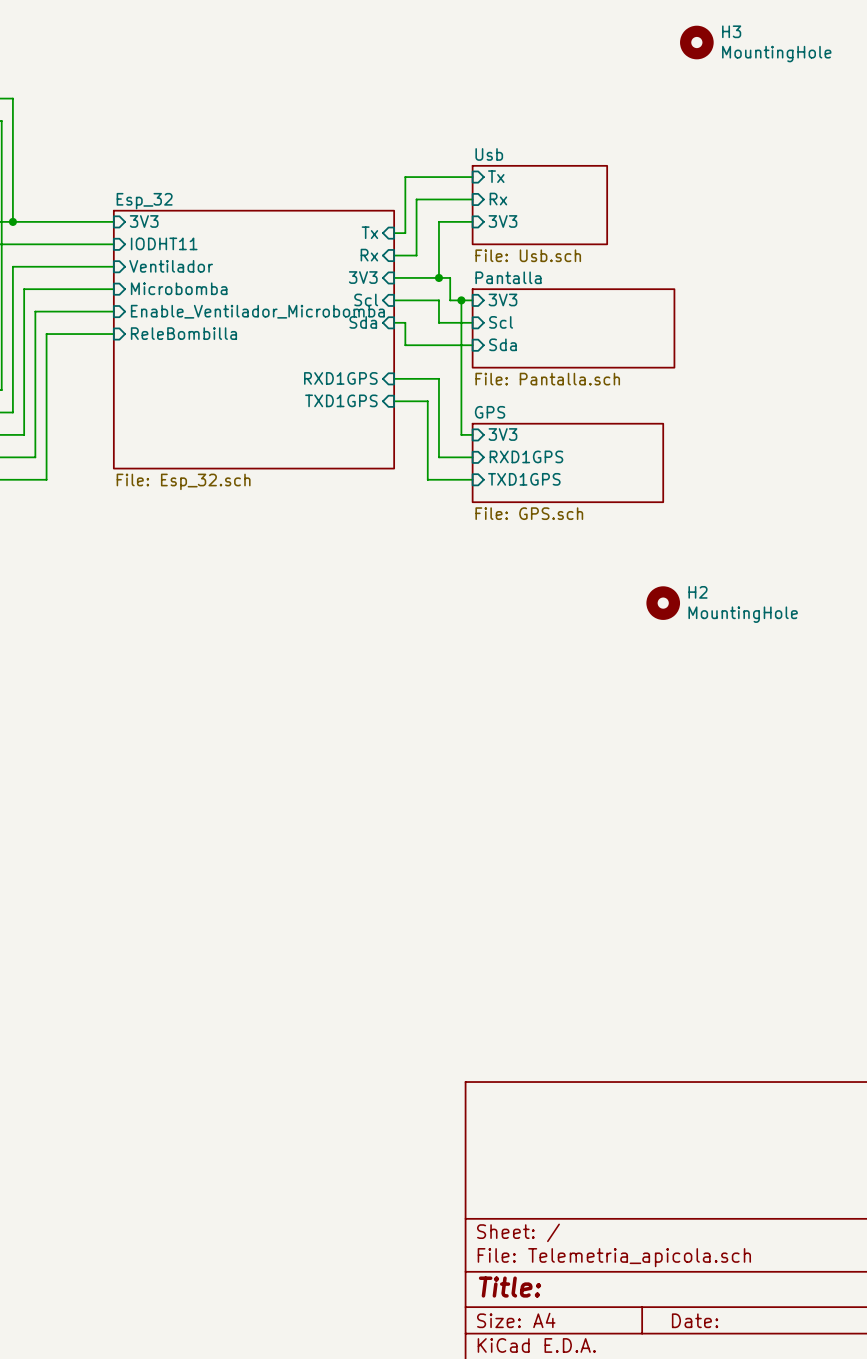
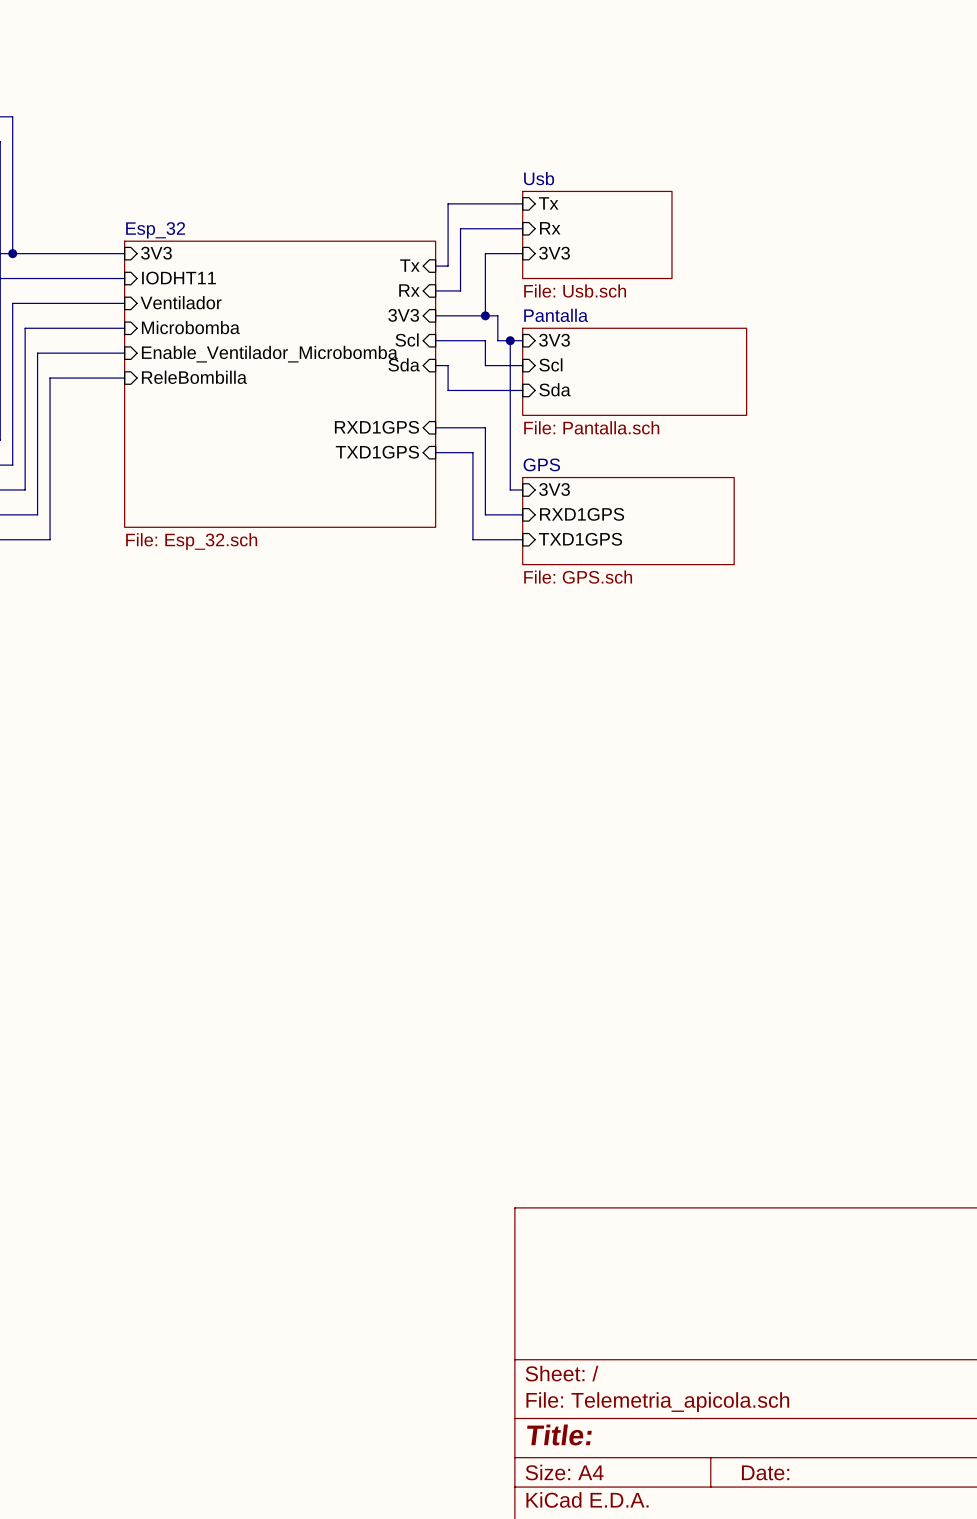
H3: MountingHole (696, 42) -> none
H2: MountingHole (663, 603) -> none

